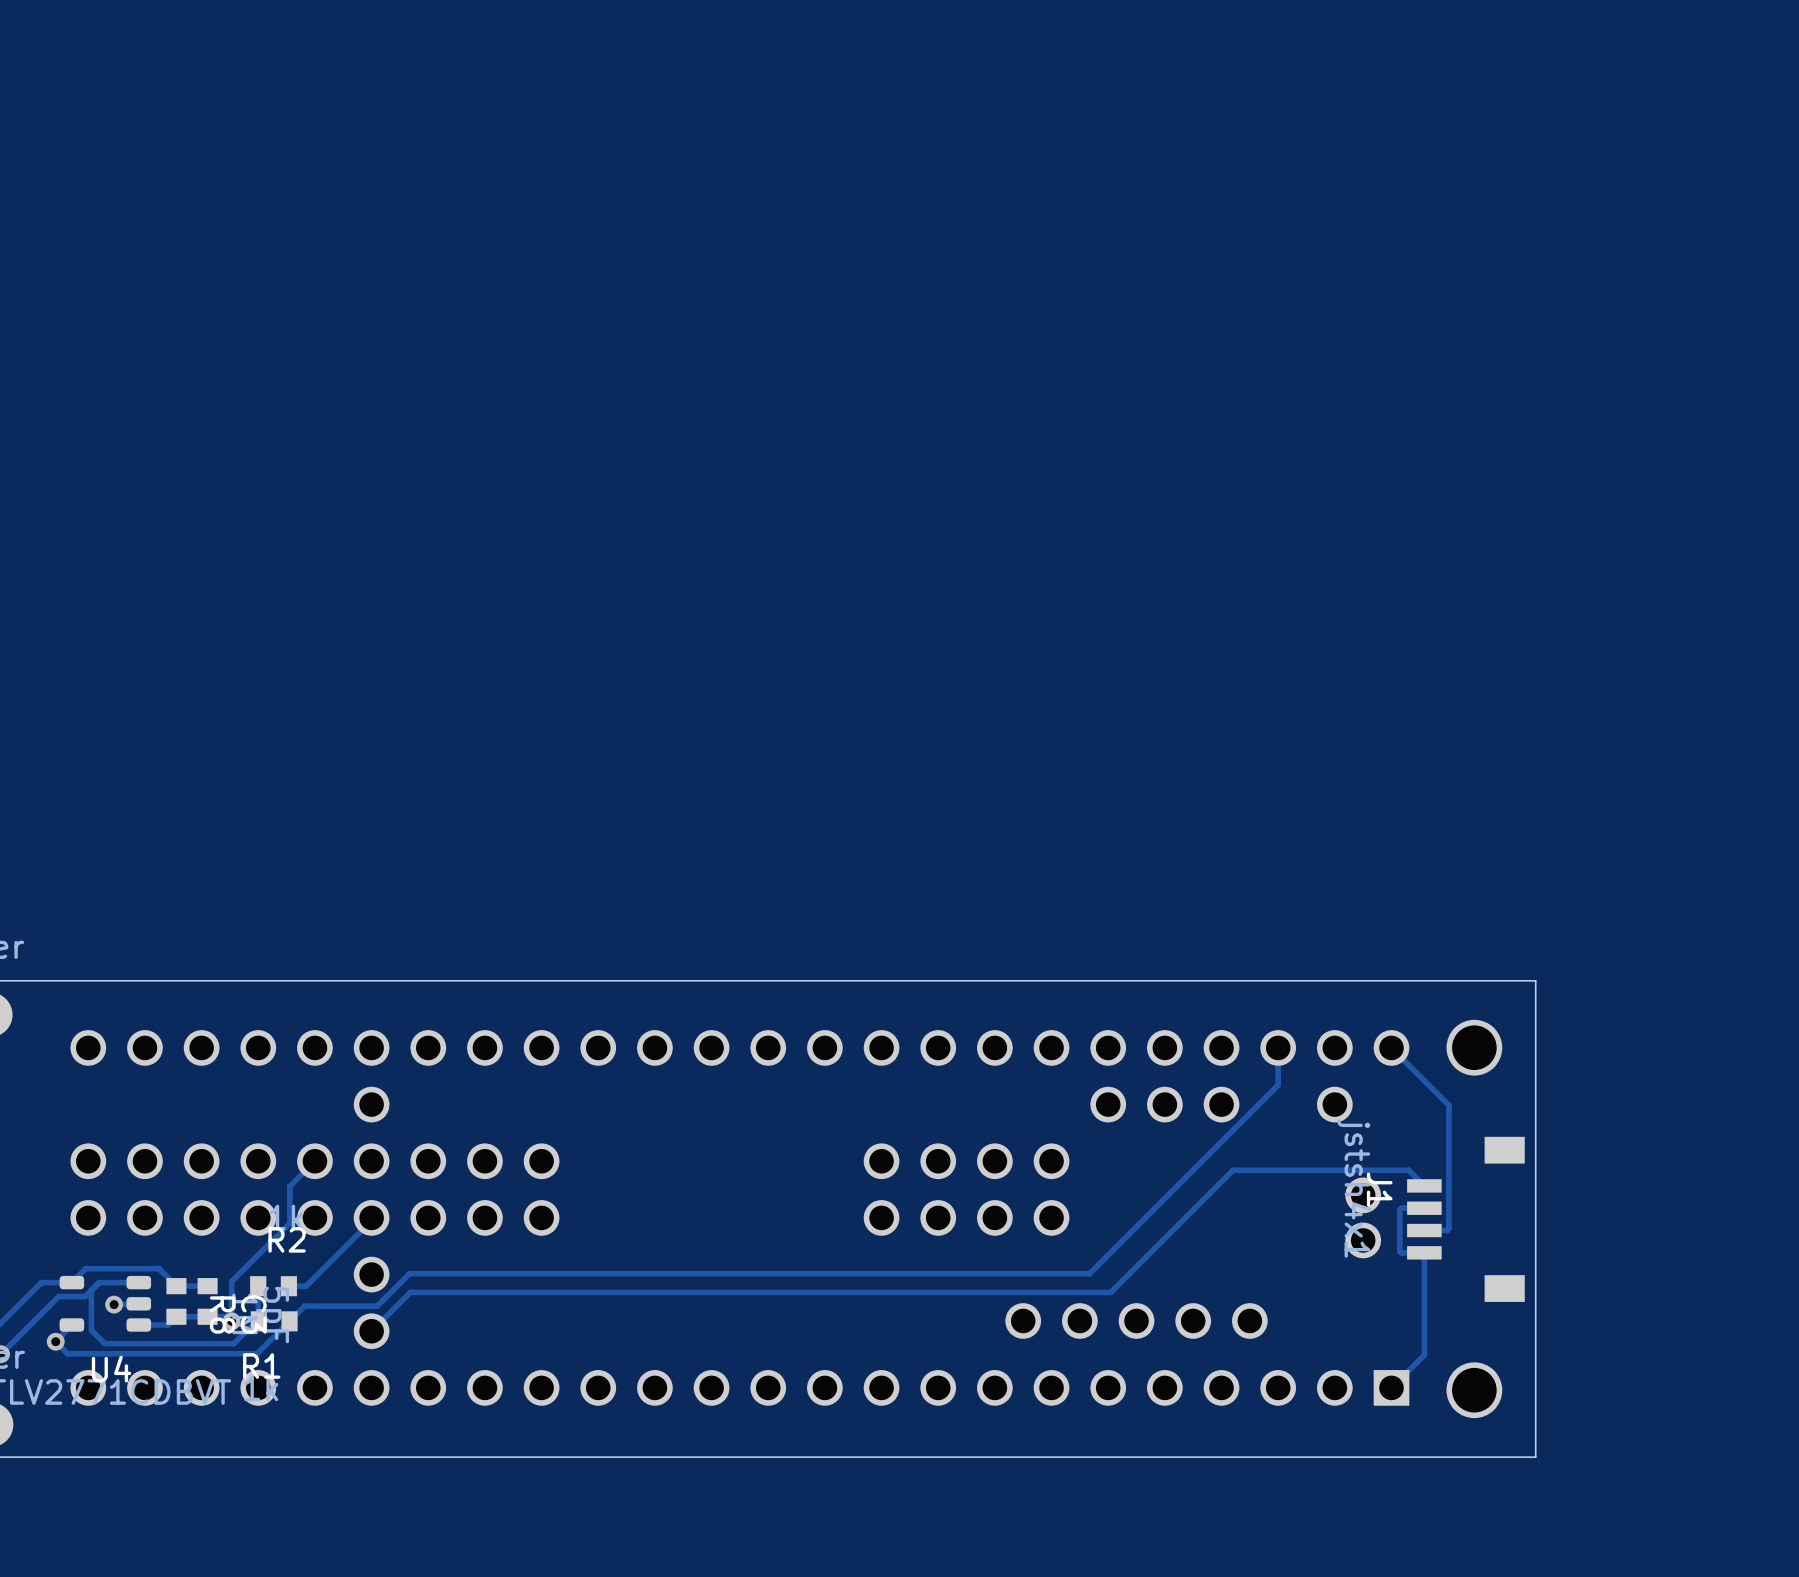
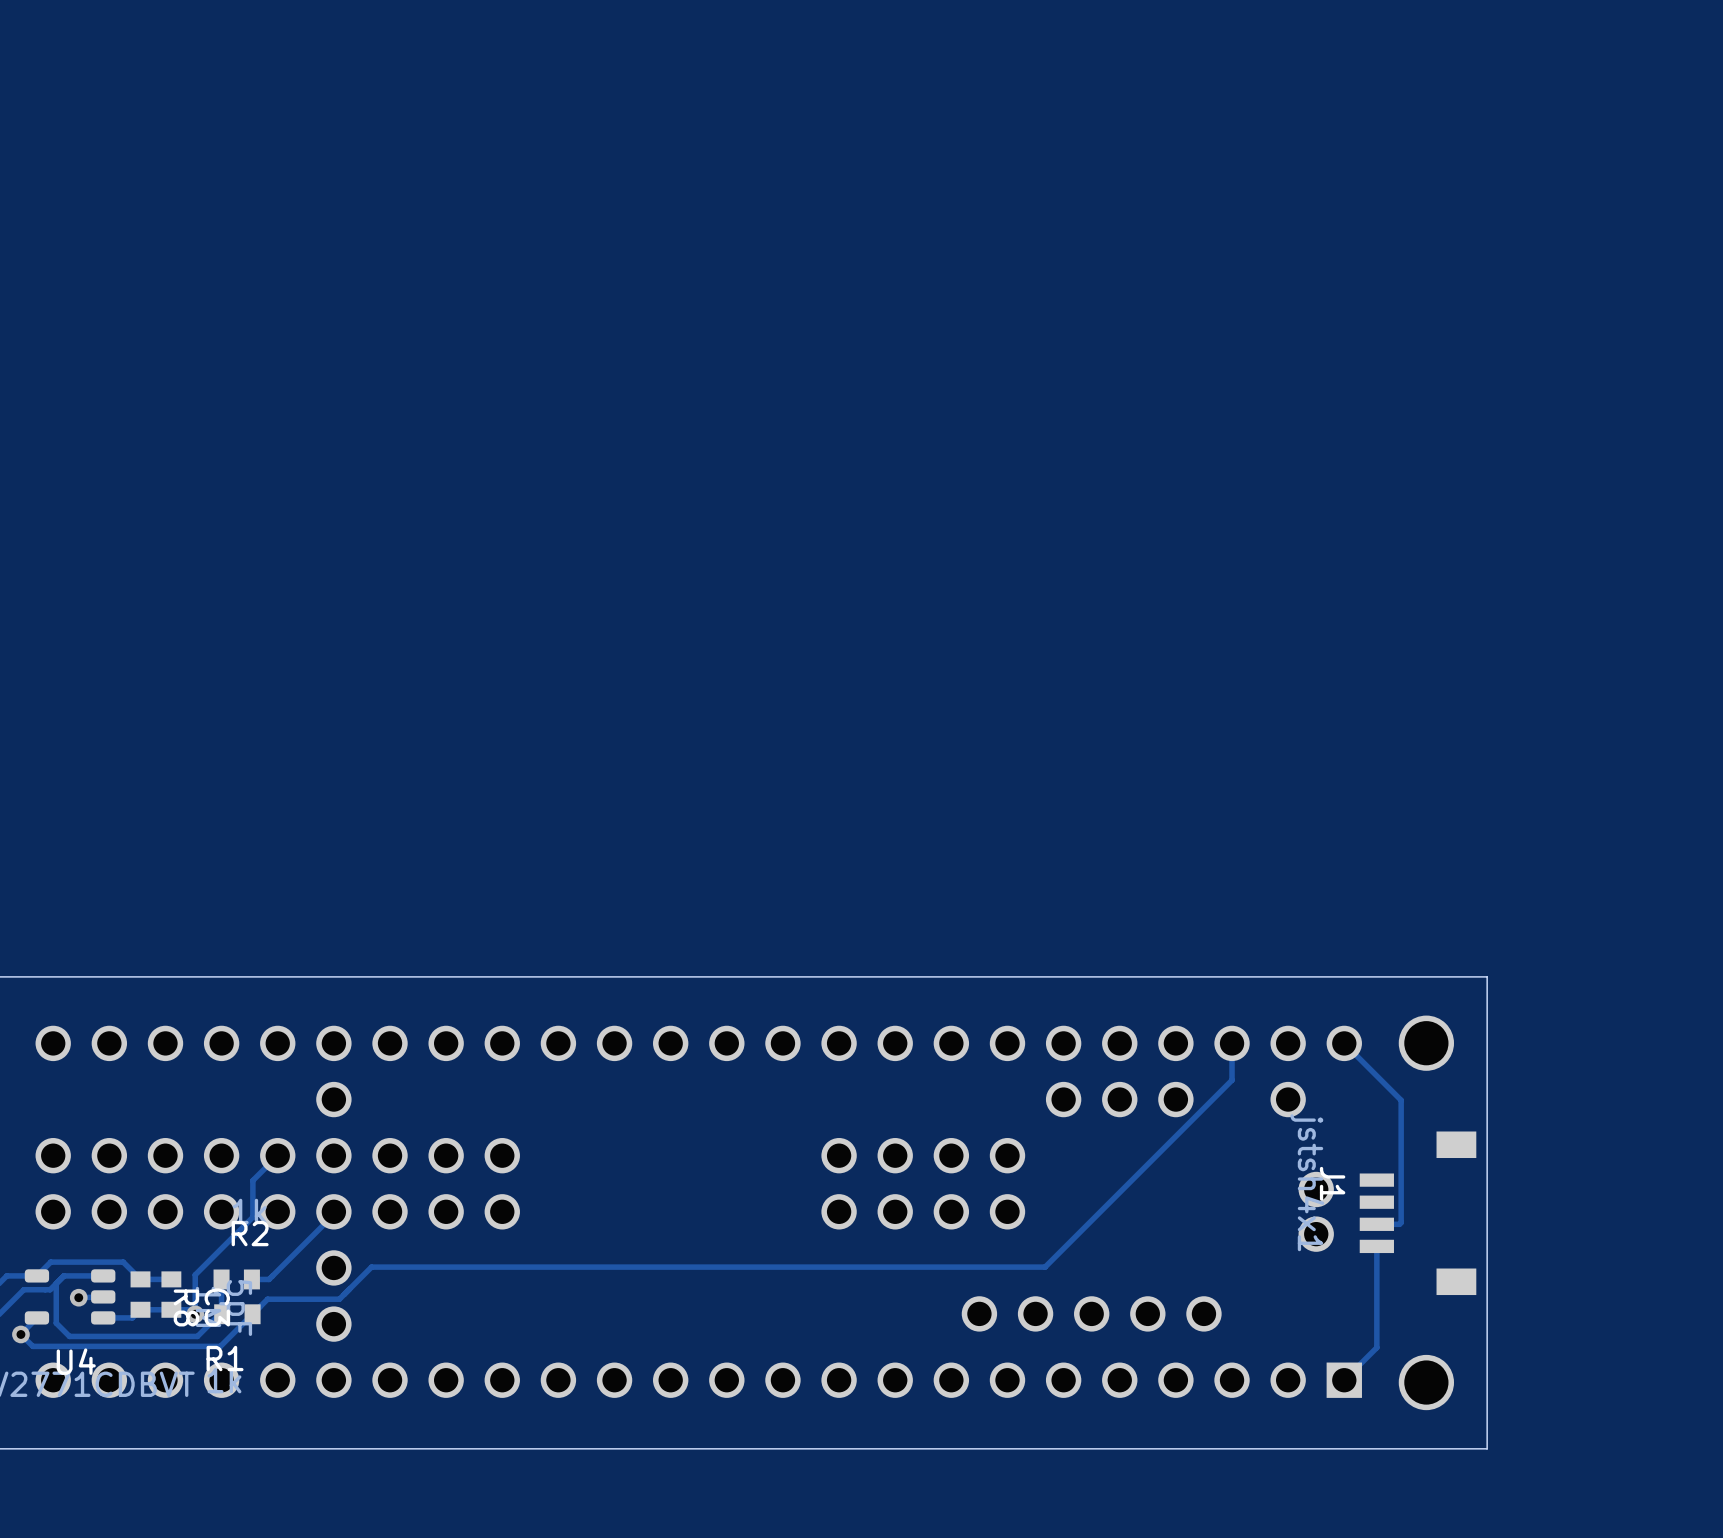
track: (1424, 1185) (1408, 1170) (1232, 1170) (1110, 1292) (410, 1292) (371, 1331) -> none
track: (1424, 1208) (1401, 1208) (1399, 1209) (1399, 1251) (1401, 1252) (1424, 1252) -> none

